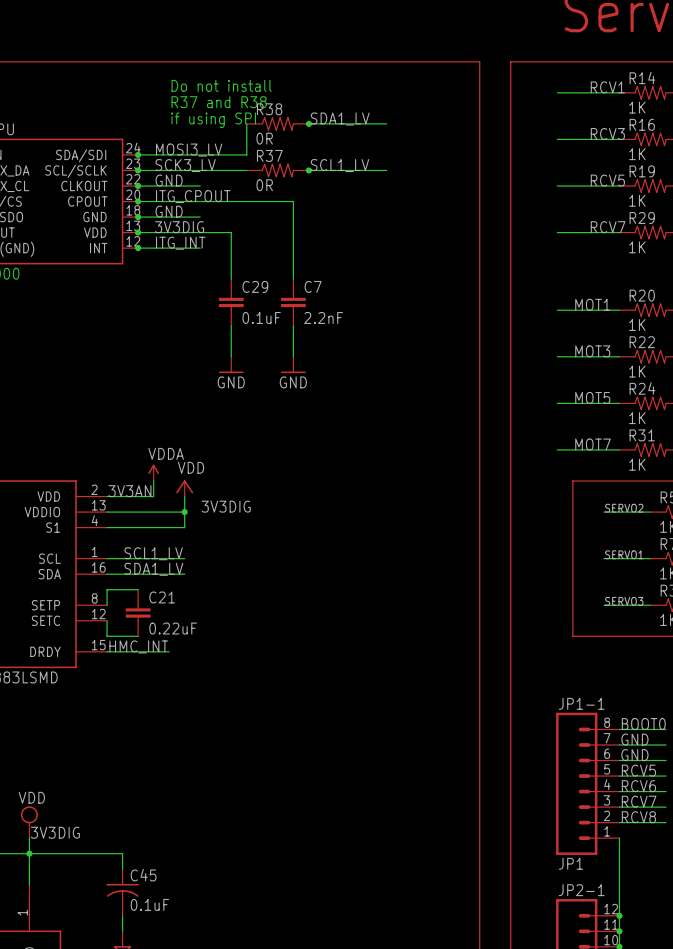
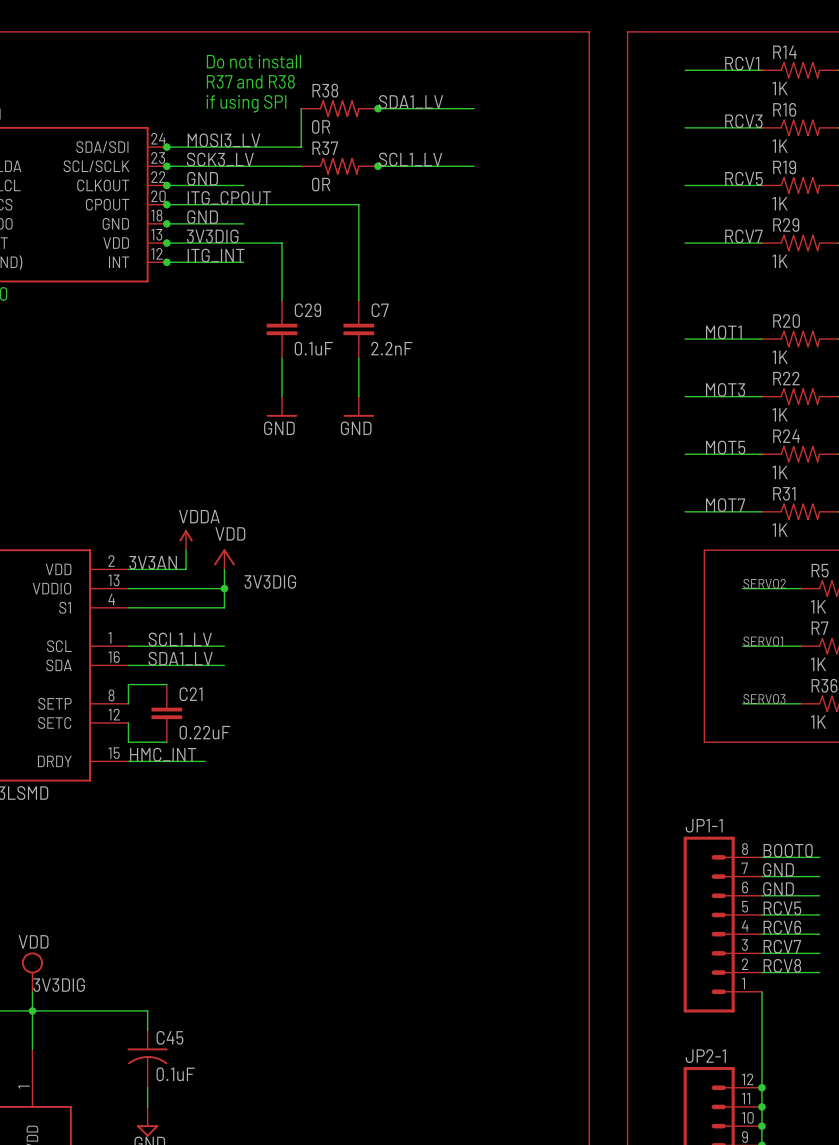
JP1-1 value: JP1 (570, 863) -> none

